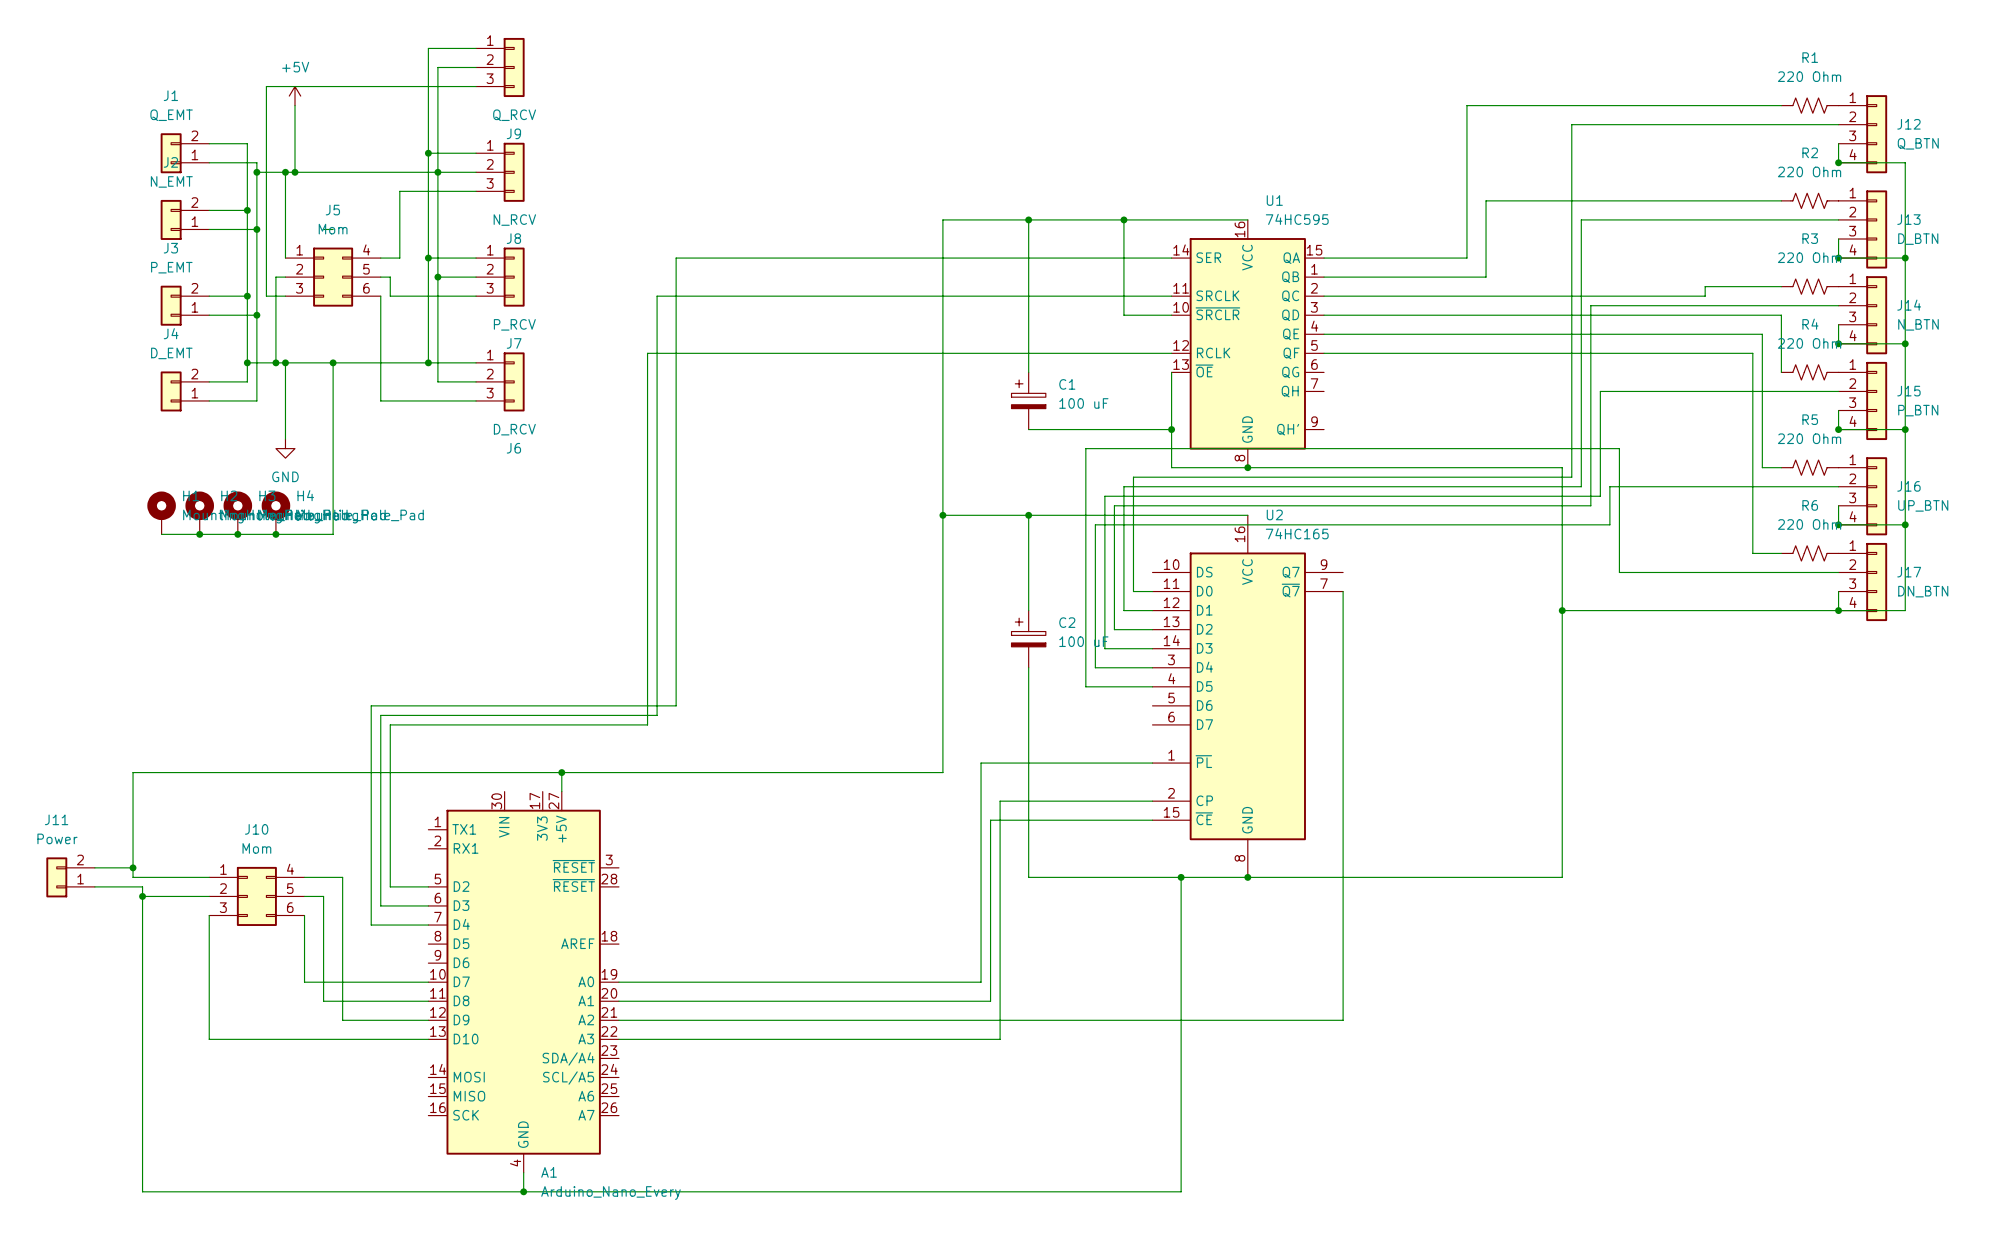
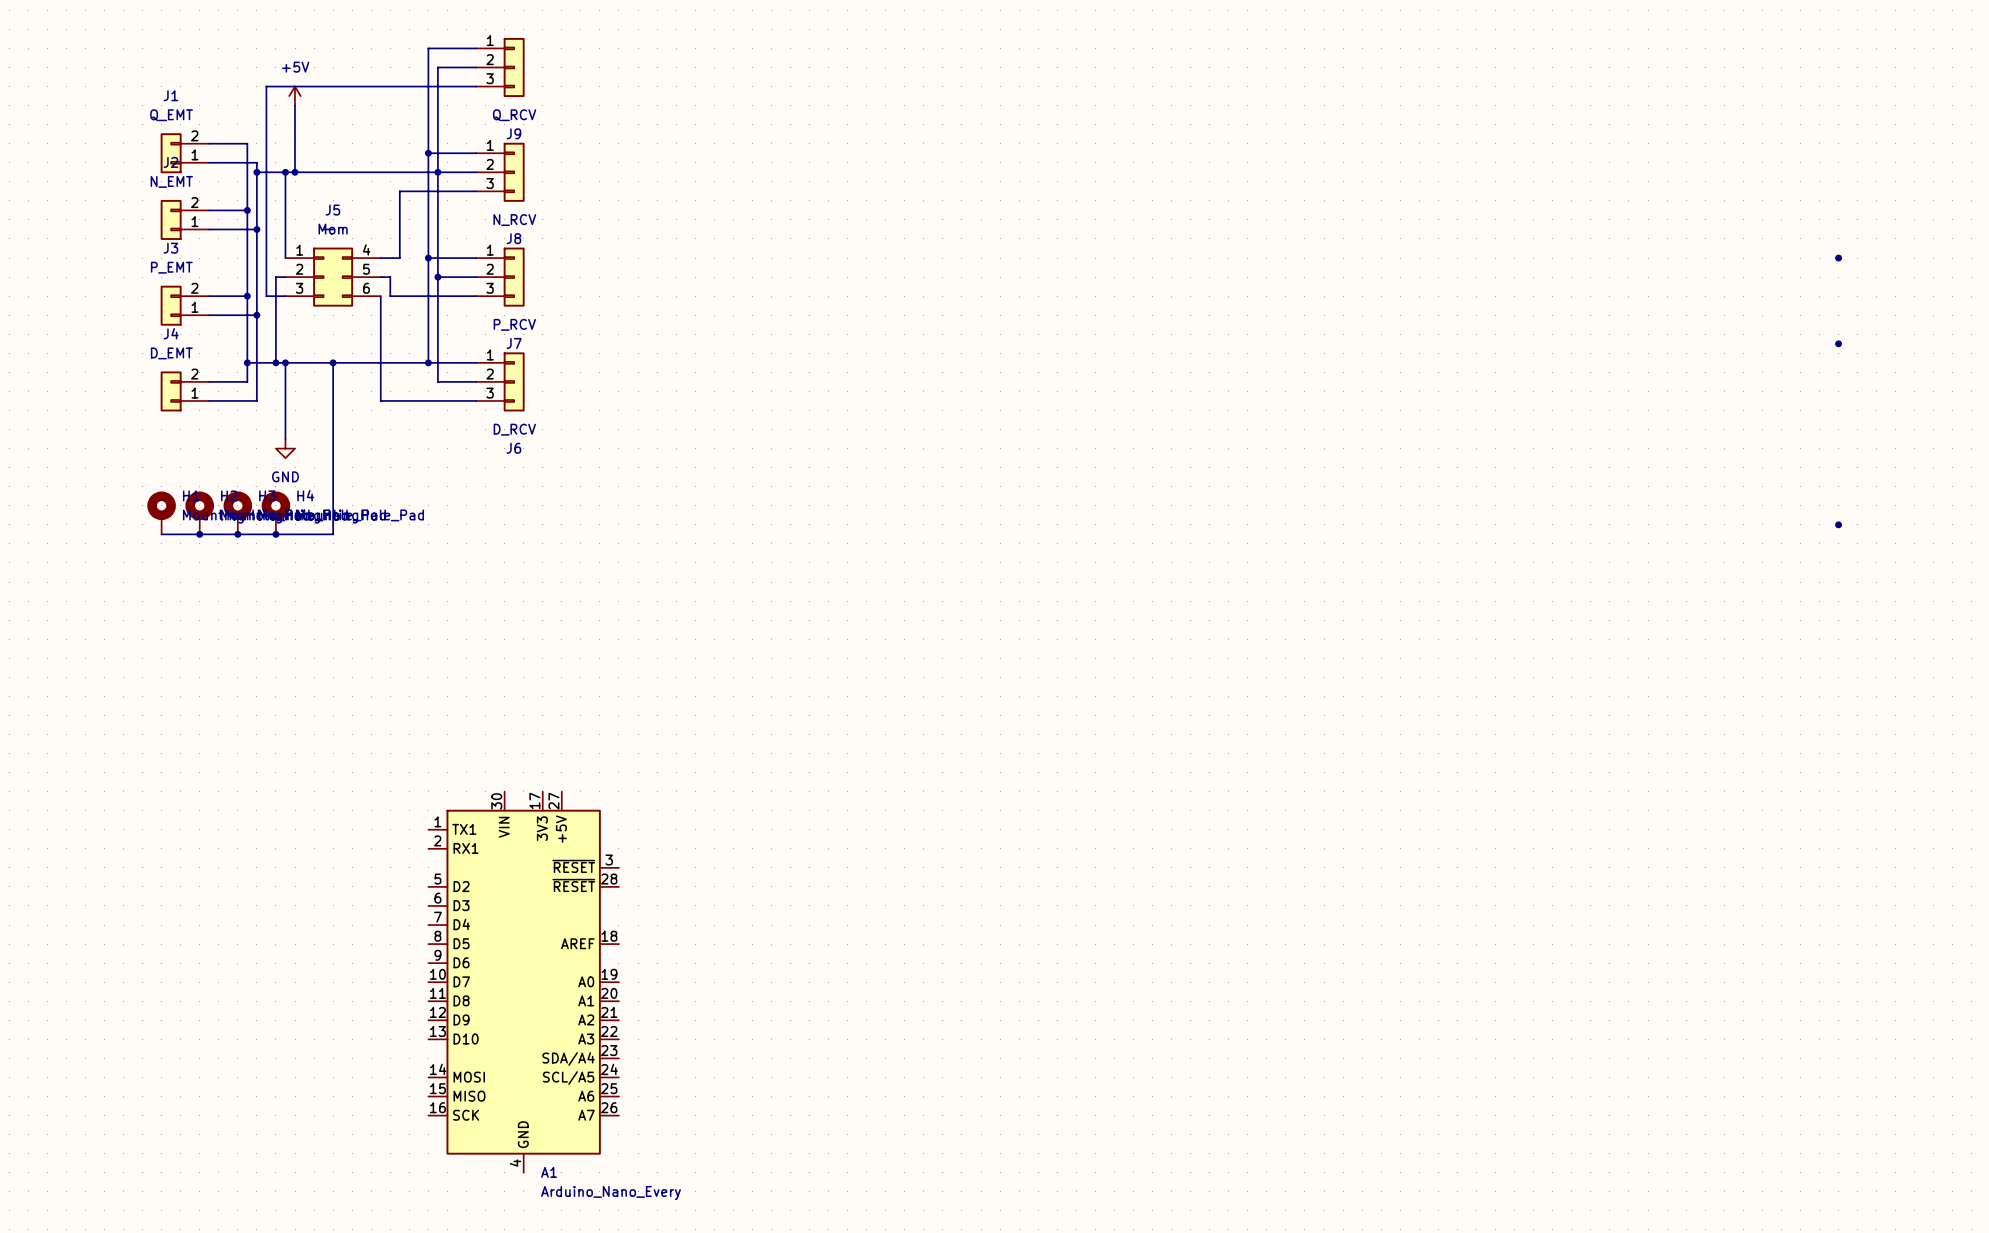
wire: (1781, 105) (1466, 105) (1466, 258) (1324, 258) -> none
R1: 220 Ohm (1809, 105) -> none
wire: (1838, 124) (1571, 124) (1571, 477) (1133, 477) (1133, 591) (1152, 591) -> none
J12: Q_BTN (1862, 134) -> none
wire: (1838, 143) (1838, 162) (1905, 162) (1905, 610) (1562, 610) -> none
junction: (1838, 162) -> none
wire: (1781, 200) (1486, 200) (1486, 277) (1324, 277) -> none
R2: 220 Ohm (1809, 200) -> none
wire: (1028, 219) (1028, 372) -> none
junction: (1028, 219) -> none
wire: (1123, 219) (1123, 315) (1171, 315) -> none
junction: (1123, 219) -> none
wire: (1247, 219) (942, 219) (942, 772) (133, 772) (133, 877) (209, 877) -> none
wire: (1838, 219) (1581, 219) (1581, 486) (1123, 486) (1123, 610) (1152, 610) -> none
J13: D_BTN (1862, 229) -> none
wire: (1838, 238) (1838, 258) (1905, 258) -> none
wire: (1171, 258) (676, 258) (676, 705) (371, 705) (371, 925) (428, 925) -> none
junction: (1905, 258) -> none
wire: (1781, 286) (1705, 286) (1705, 296) (1324, 296) -> none
R3: 220 Ohm (1809, 286) -> none
wire: (1171, 296) (657, 296) (657, 715) (380, 715) (380, 905) (428, 905) -> none
wire: (1838, 305) (1590, 305) (1590, 505) (1114, 505) (1114, 629) (1152, 629) -> none
wire: (1324, 315) (1781, 315) (1781, 372) -> none
J14: N_BTN (1862, 315) -> none
wire: (1838, 324) (1838, 343) (1905, 343) -> none
wire: (1324, 334) (1762, 334) (1762, 467) (1781, 467) -> none
U1: 74HC595 (1247, 343) -> none
junction: (1905, 343) -> none
wire: (1171, 353) (647, 353) (647, 724) (390, 724) (390, 886) (428, 886) -> none
wire: (1324, 353) (1752, 353) (1752, 553) (1781, 553) -> none
wire: (1171, 372) (1171, 467) (1562, 467) (1562, 877) (1028, 877) (1028, 667) -> none
R4: 220 Ohm (1809, 372) -> none
wire: (1838, 391) (1600, 391) (1600, 496) (1104, 496) (1104, 648) (1152, 648) -> none
C1: 100 uF (1028, 400) -> none
J15: P_BTN (1862, 400) -> none
wire: (1838, 410) (1838, 429) (1905, 429) -> none
wire: (1028, 429) (1171, 429) -> none
junction: (1171, 429) -> none
junction: (1838, 429) -> none
junction: (1905, 429) -> none
junction: (1247, 467) -> none
R5: 220 Ohm (1809, 467) -> none
wire: (1838, 486) (1609, 486) (1609, 524) (1095, 524) (1095, 667) (1152, 667) -> none
J16: UP_BTN (1862, 496) -> none
wire: (1838, 505) (1838, 524) (1905, 524) -> none
wire: (942, 515) (1247, 515) -> none
junction: (942, 515) -> none
wire: (1028, 515) (1028, 610) -> none
junction: (1028, 515) -> none
junction: (1905, 524) -> none
R6: 220 Ohm (1809, 553) -> none
wire: (1838, 572) (1619, 572) (1619, 448) (1085, 448) (1085, 686) (1152, 686) -> none
J17: DN_BTN (1862, 582) -> none
wire: (1343, 591) (1343, 1020) (618, 1020) -> none
wire: (1838, 591) (1838, 610) -> none
junction: (1562, 610) -> none
junction: (1838, 610) -> none
C2: 100 uF (1028, 639) -> none
U2: 74HC165 (1247, 696) -> none
wire: (1152, 763) (981, 763) (981, 982) (618, 982) -> none
wire: (561, 772) (561, 791) -> none
junction: (561, 772) -> none
wire: (1152, 801) (1000, 801) (1000, 1039) (618, 1039) -> none
wire: (1152, 820) (990, 820) (990, 1001) (618, 1001) -> none
wire: (94, 867) (133, 867) -> none
junction: (133, 867) -> none
J11: Power (70, 877) -> none
wire: (304, 877) (342, 877) (342, 1020) (428, 1020) -> none
wire: (1181, 877) (1181, 1191) (142, 1191) (142, 886) (94, 886) -> none
junction: (1181, 877) -> none
junction: (1247, 877) -> none
wire: (142, 896) (209, 896) -> none
junction: (142, 896) -> none
J10: Mom (256, 896) -> none
wire: (304, 896) (323, 896) (323, 1001) (428, 1001) -> none
wire: (209, 915) (209, 1039) (428, 1039) -> none
wire: (304, 915) (304, 982) (428, 982) -> none
wire: (523, 1172) (523, 1191) -> none
junction: (523, 1191) -> none

